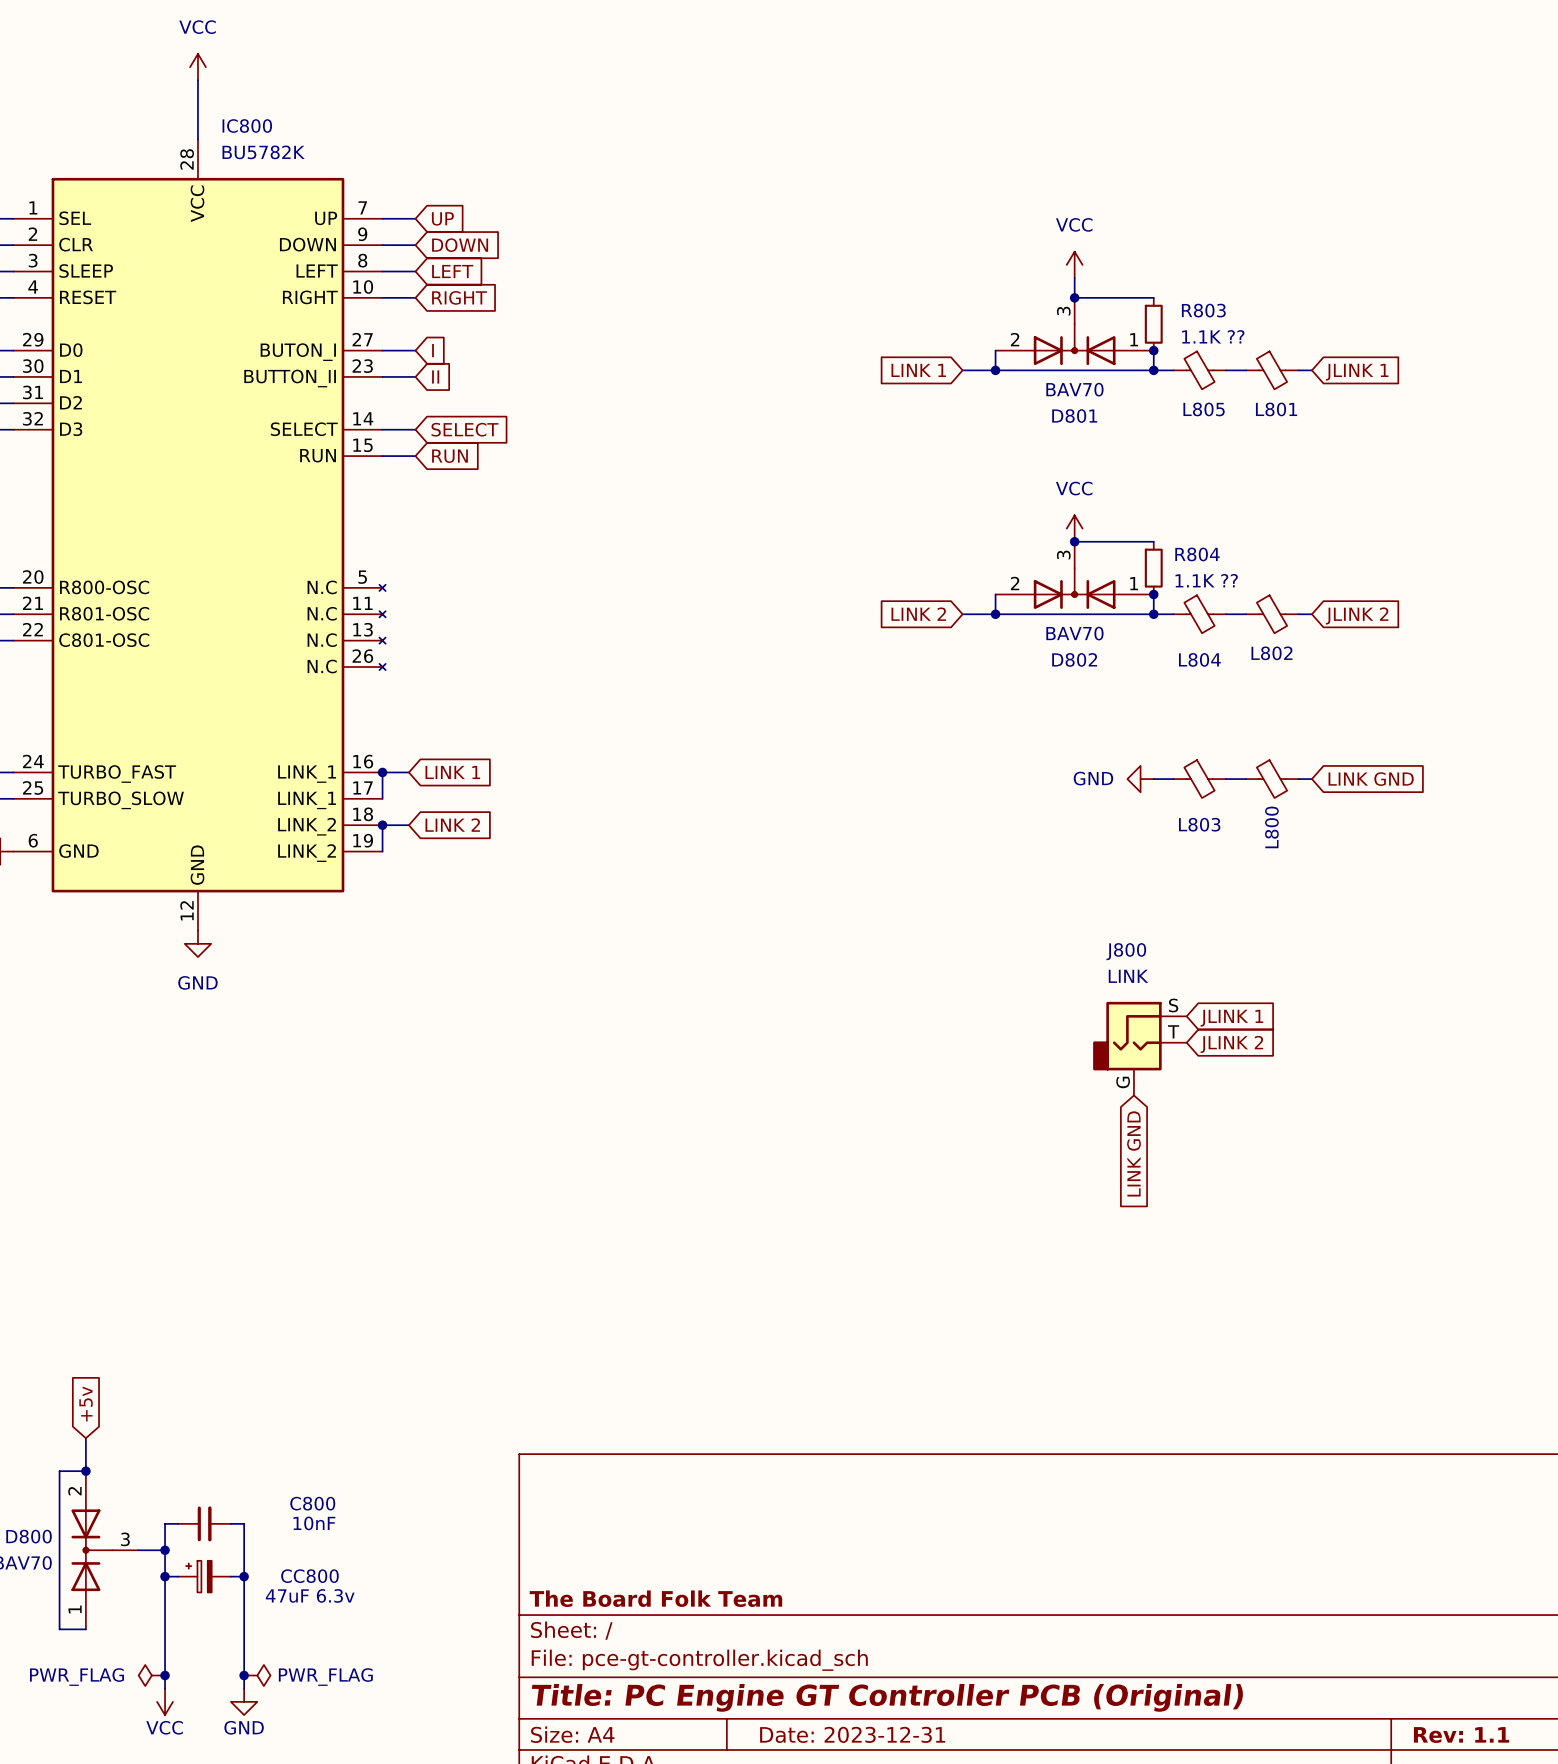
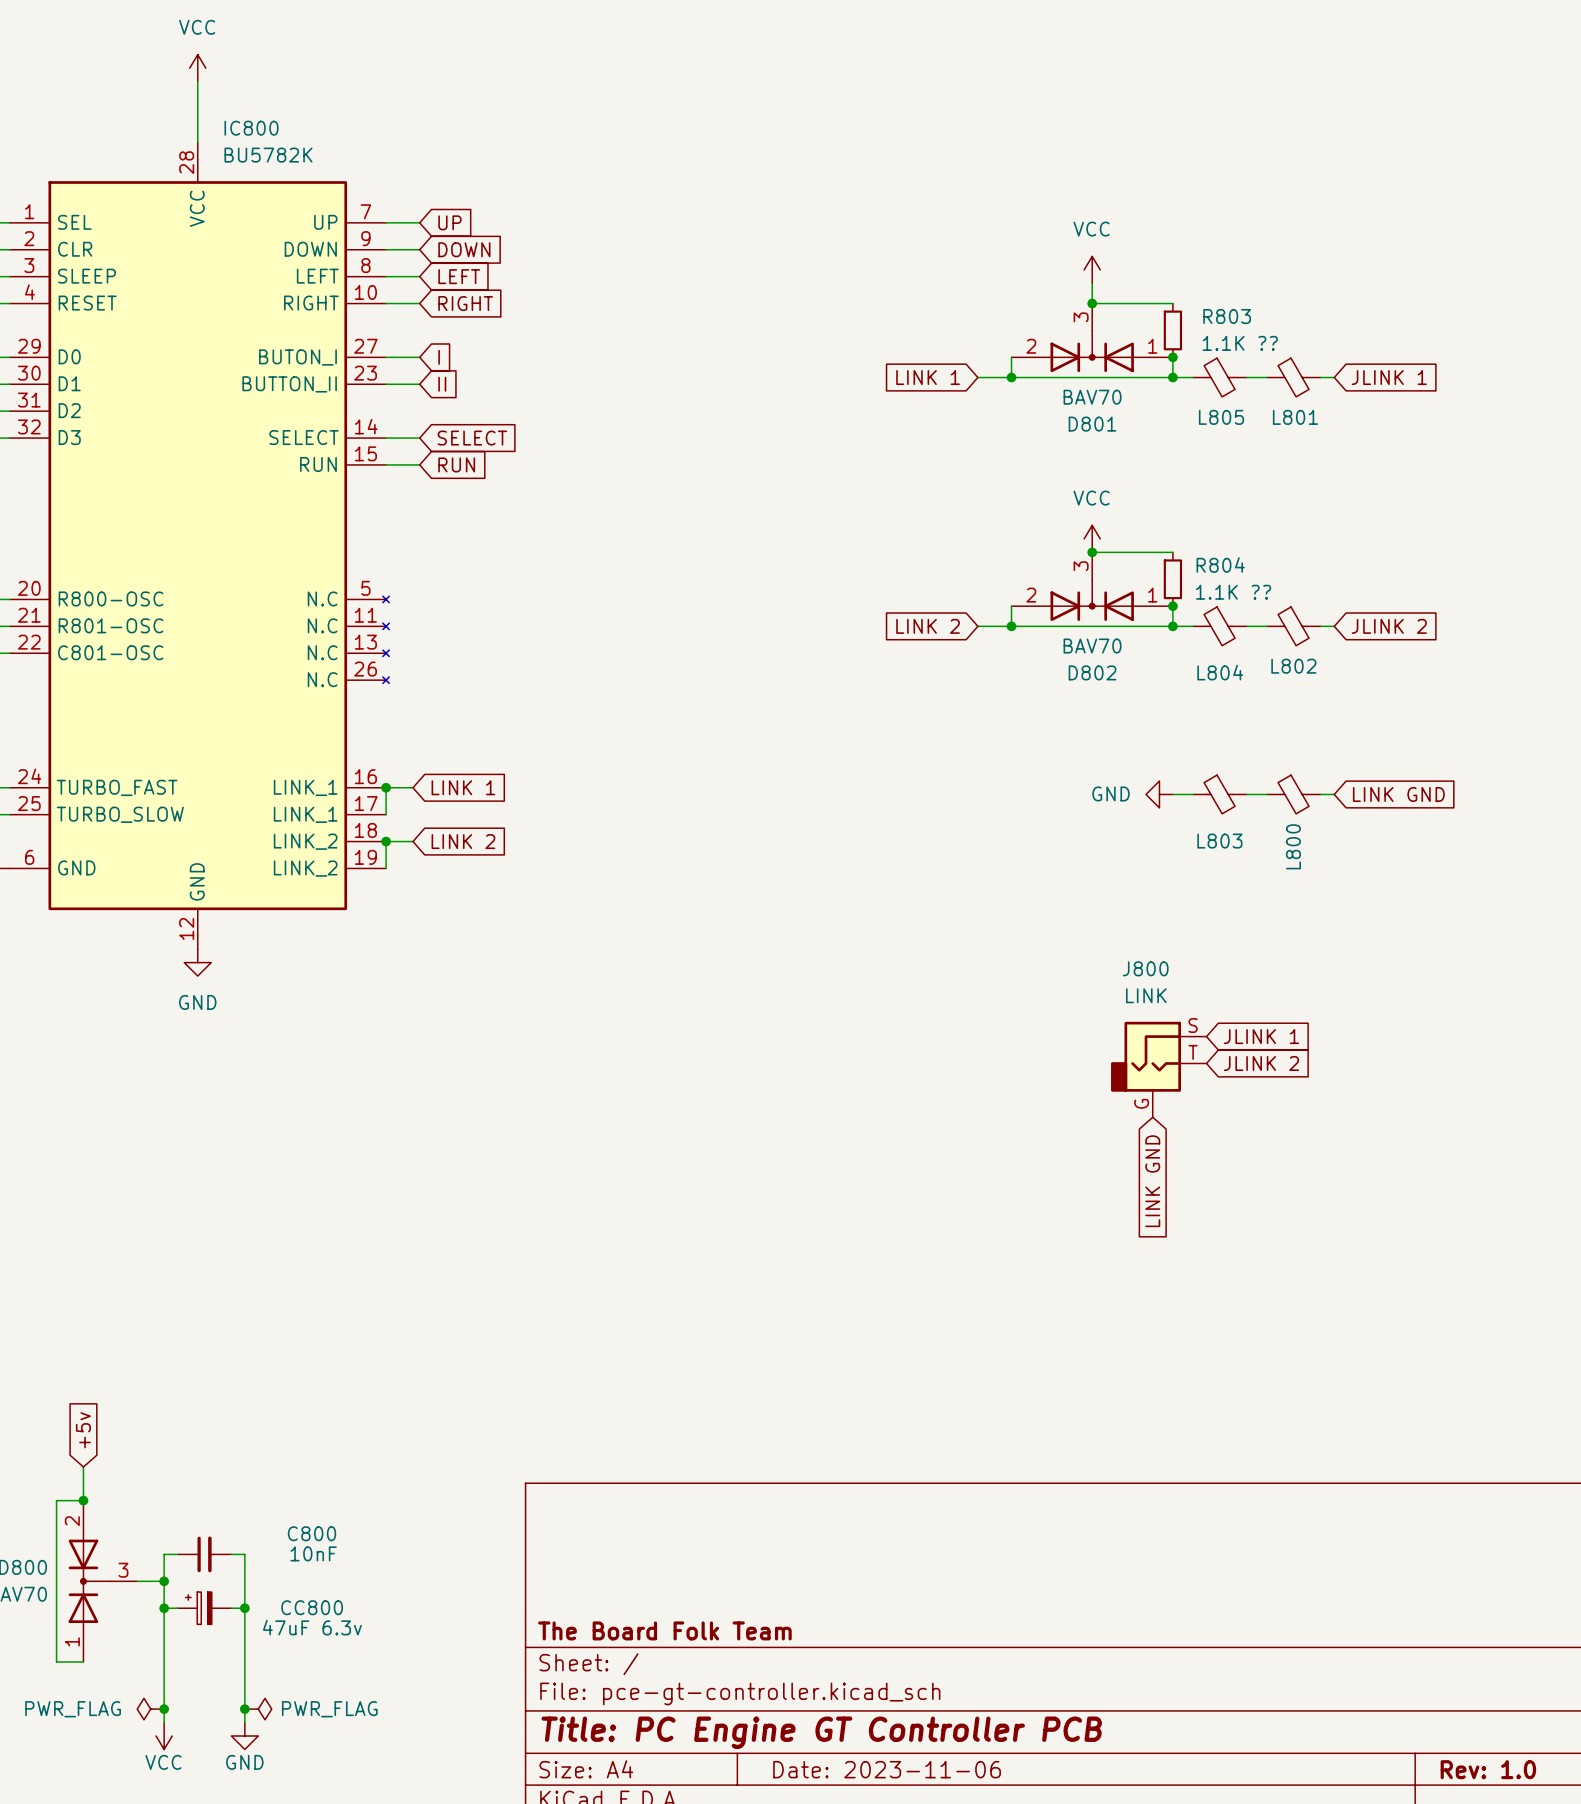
title block: Title: PC Engine GT Controller PCB (Original) (887, 1697) -> Title: PC Engine GT Controller PCB (821, 1732)
title block: Date: 2023-12-31 (852, 1734) -> Date: 2023-11-06 (887, 1769)
title block: Rev: 1.1 (1461, 1735) -> Rev: 1.0 (1488, 1769)

